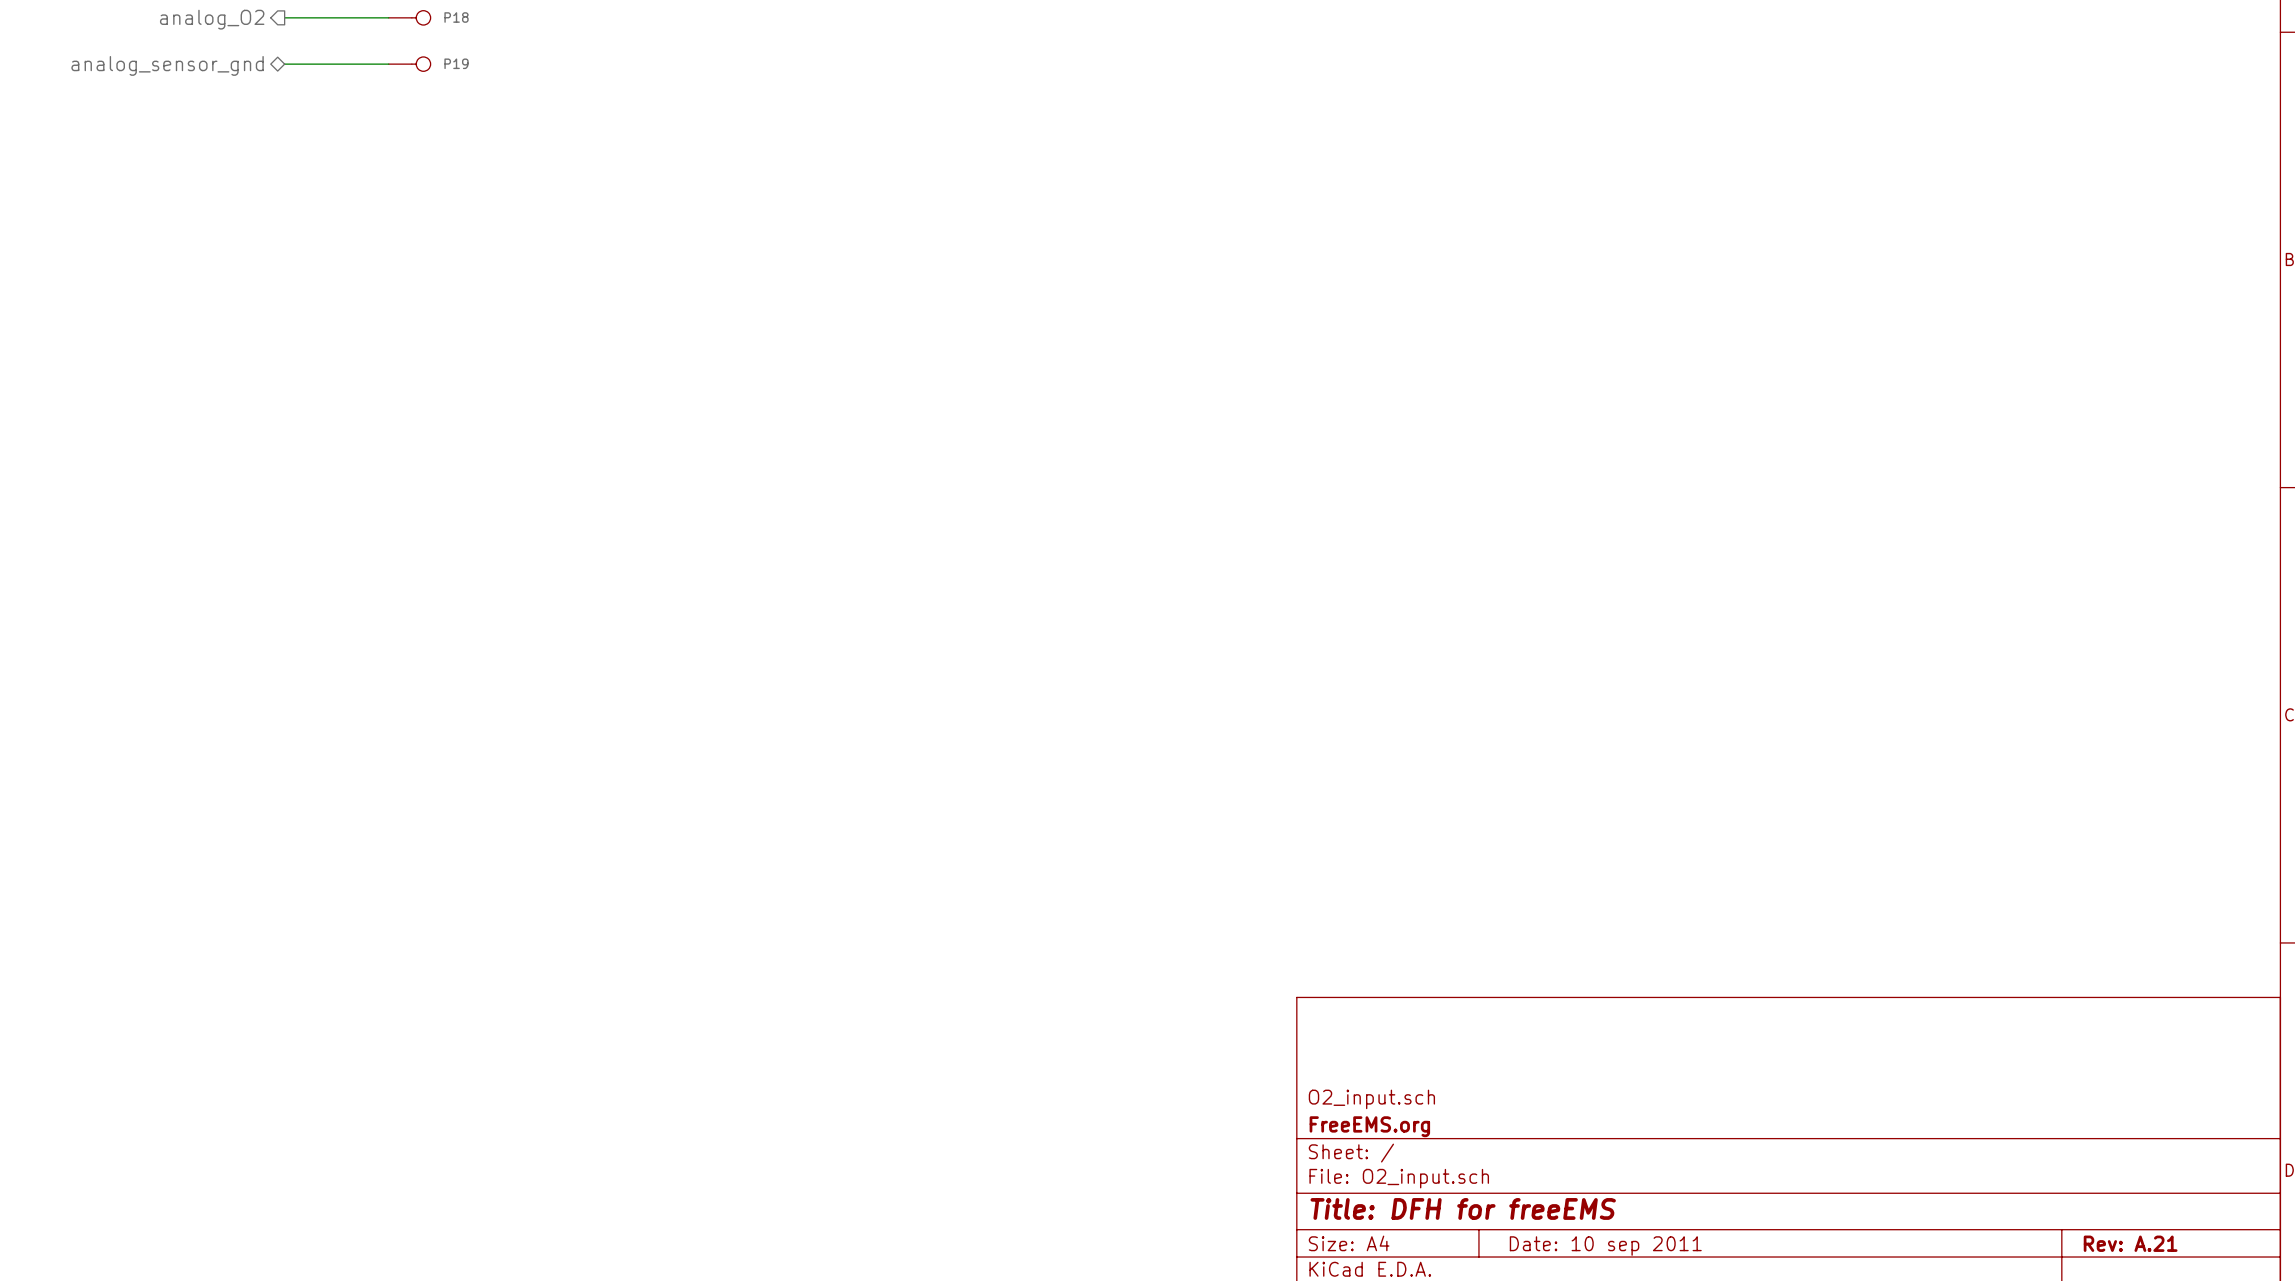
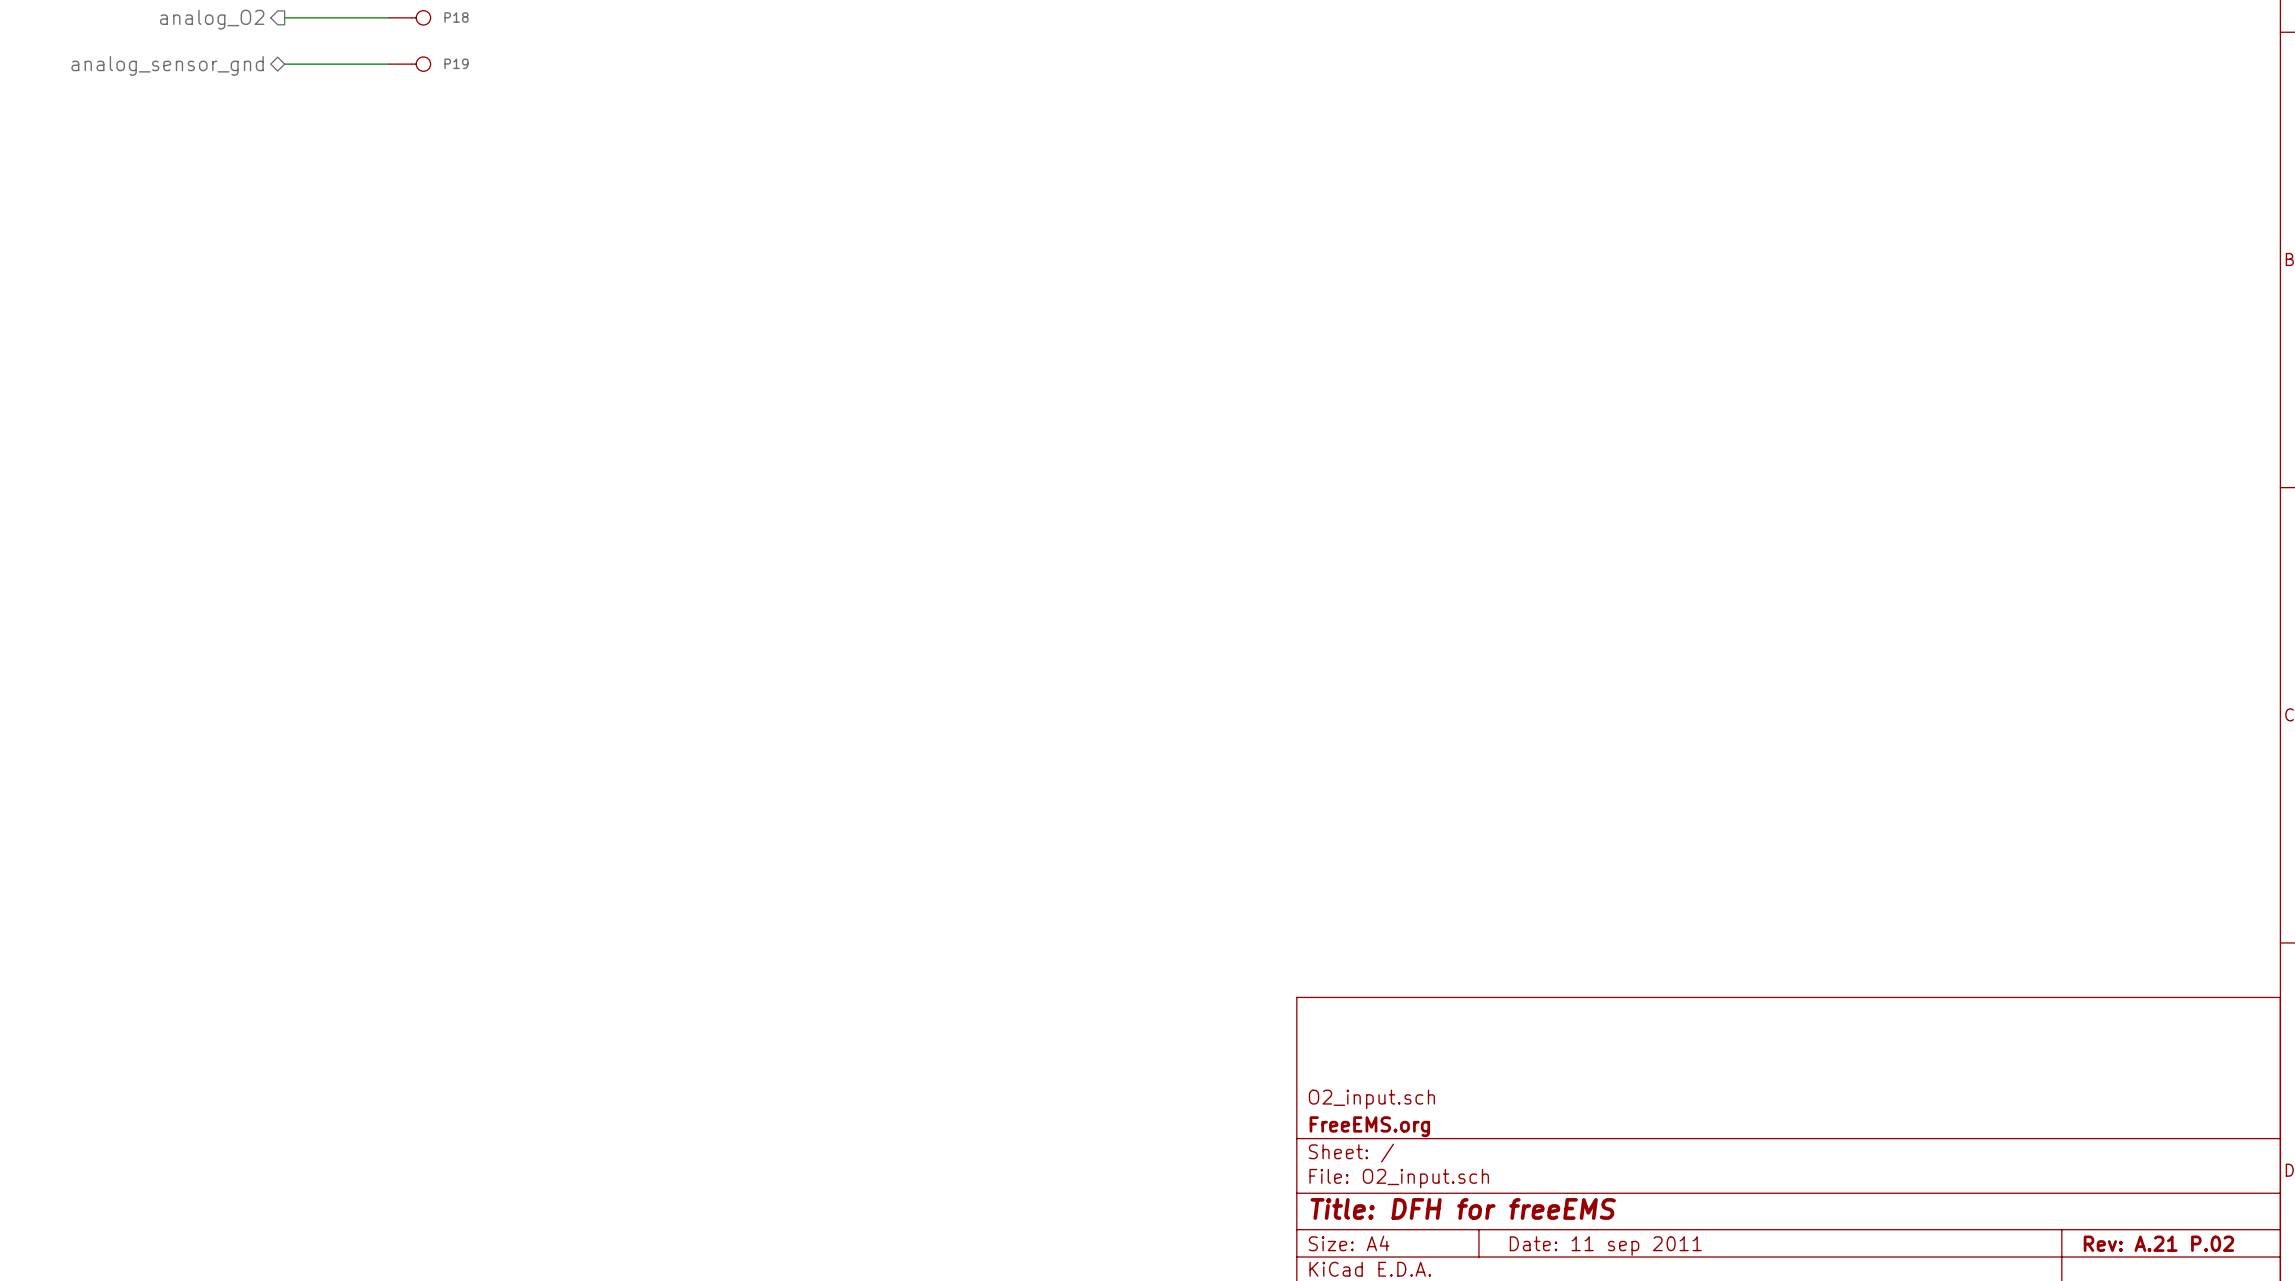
title block: Rev: A.21 (2130, 1243) -> Rev: A.21 P.02 (2158, 1243)
title block: Date: 10 sep 2011 (1605, 1246) -> Date: 11 sep 2011 (1605, 1246)

